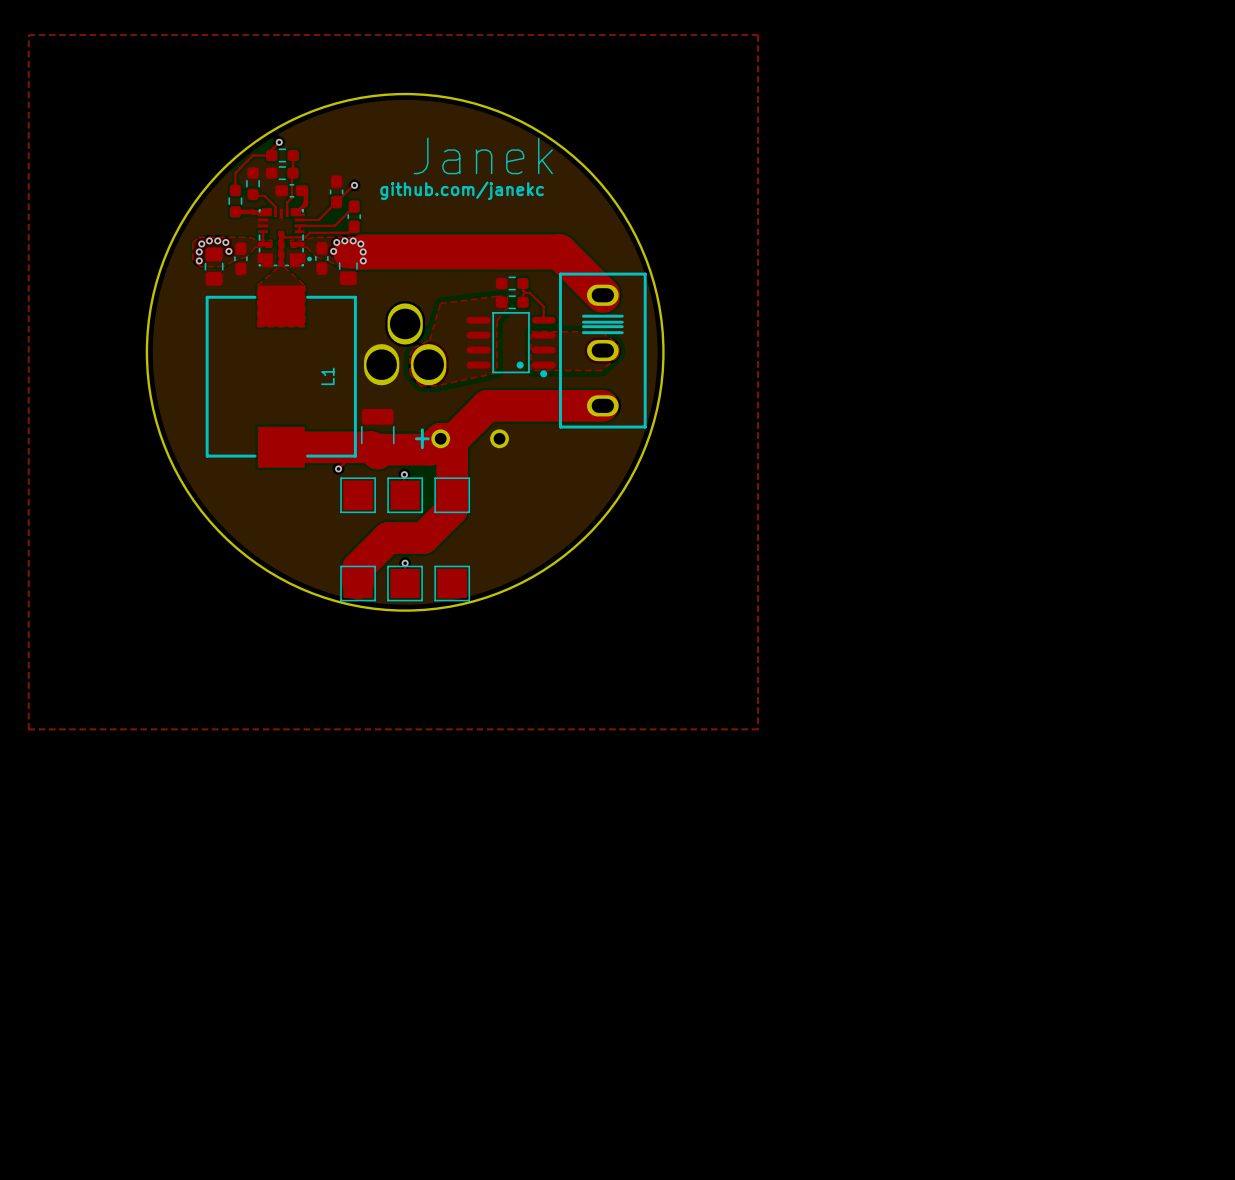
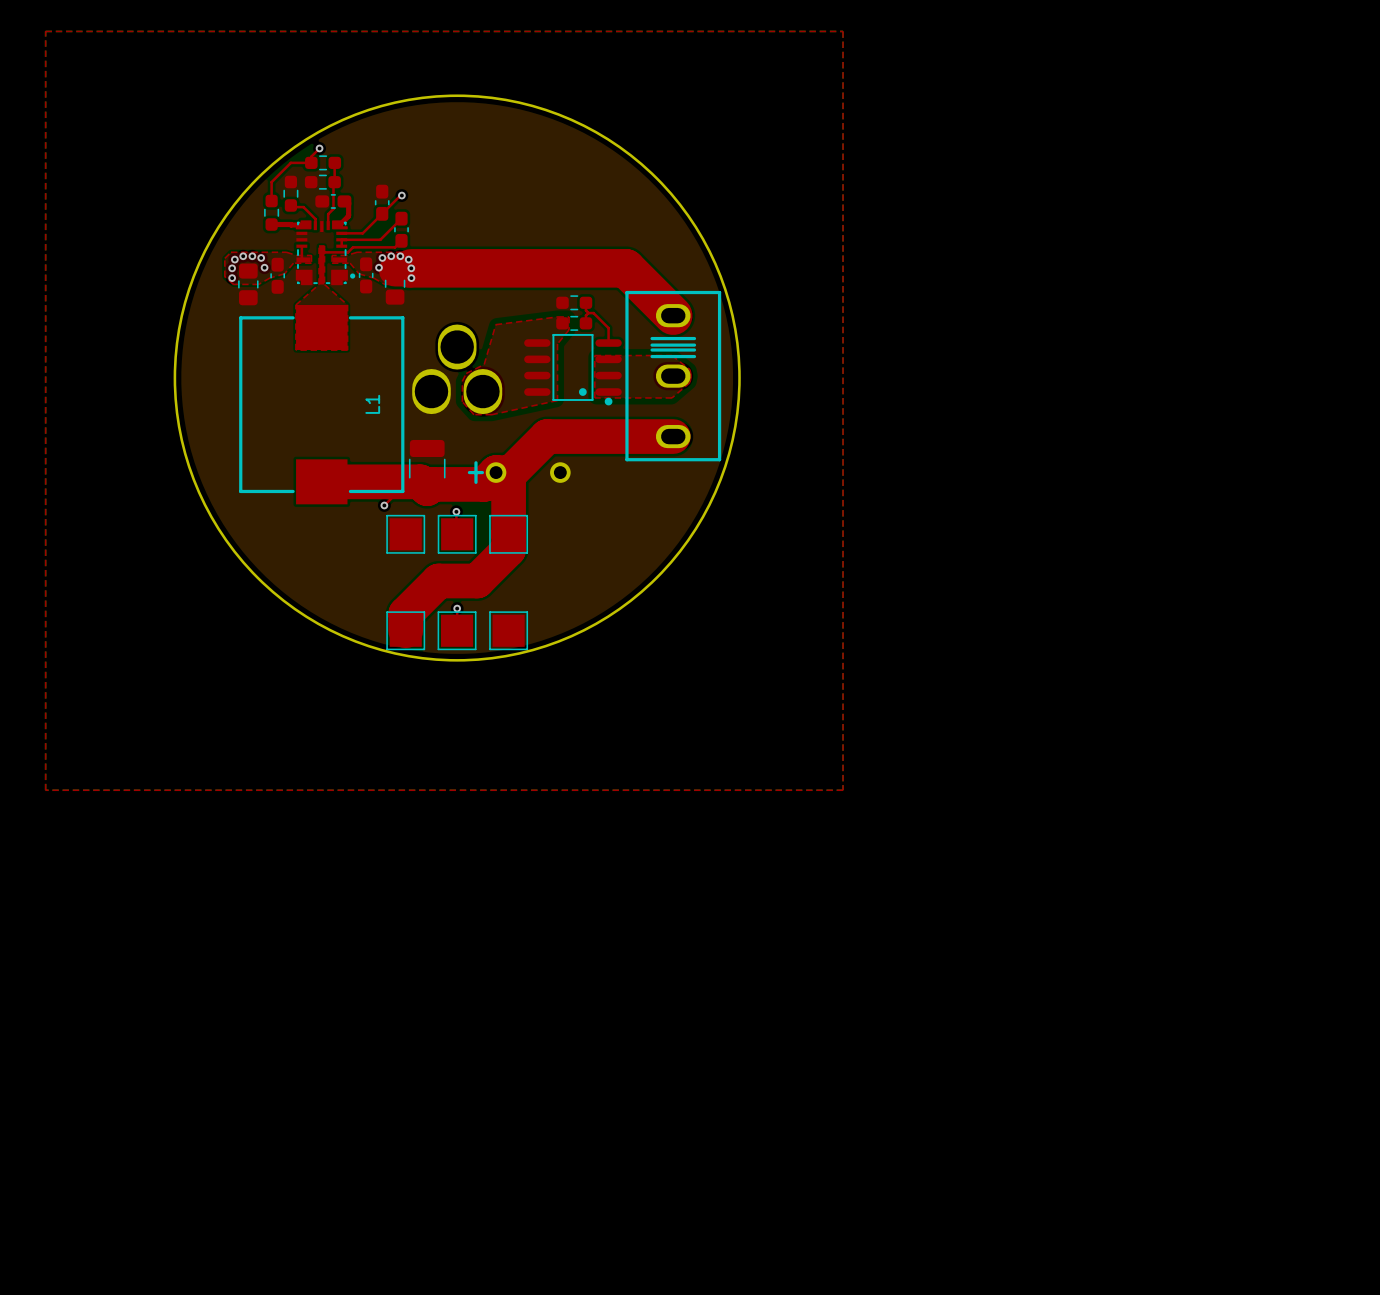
text: Janek (483, 155) -> none
text: github.com/janekc (462, 190) -> none

